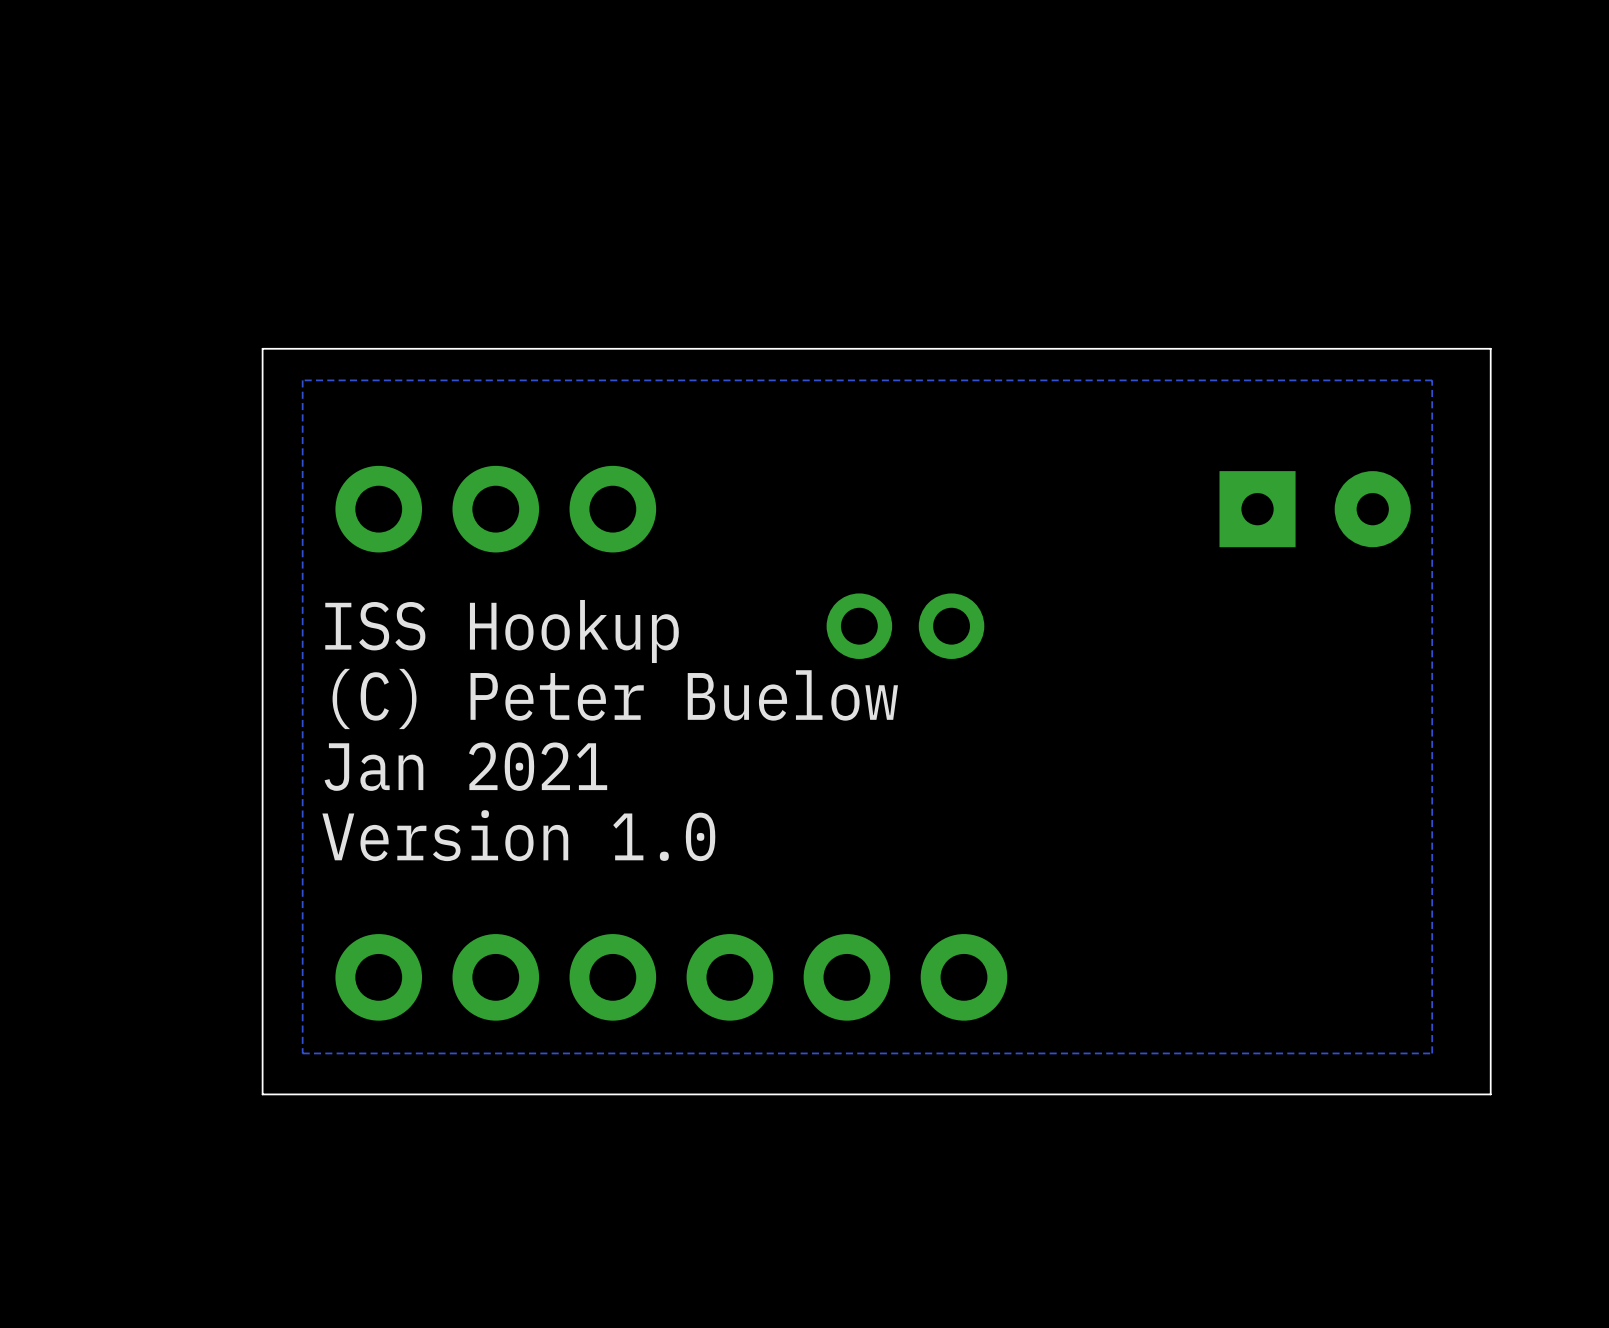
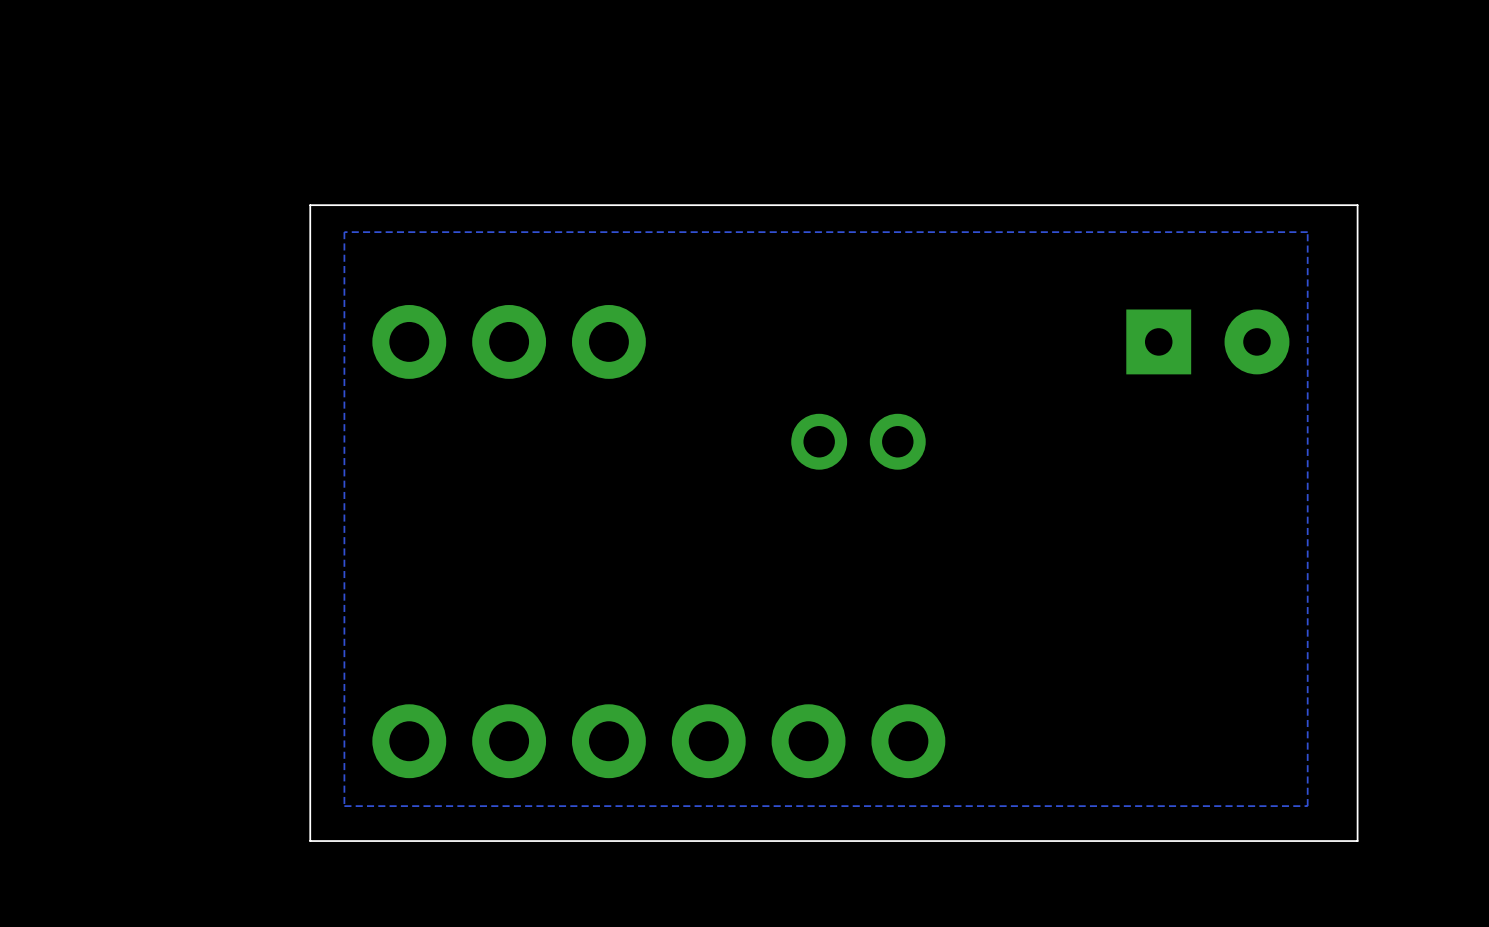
text: ISS Hookup (502, 631) -> none
text: (C) Peter Buelow (615, 698) -> none
text: Jan 2021 (465, 766) -> none
text: Version 1.0 (518, 835) -> none

